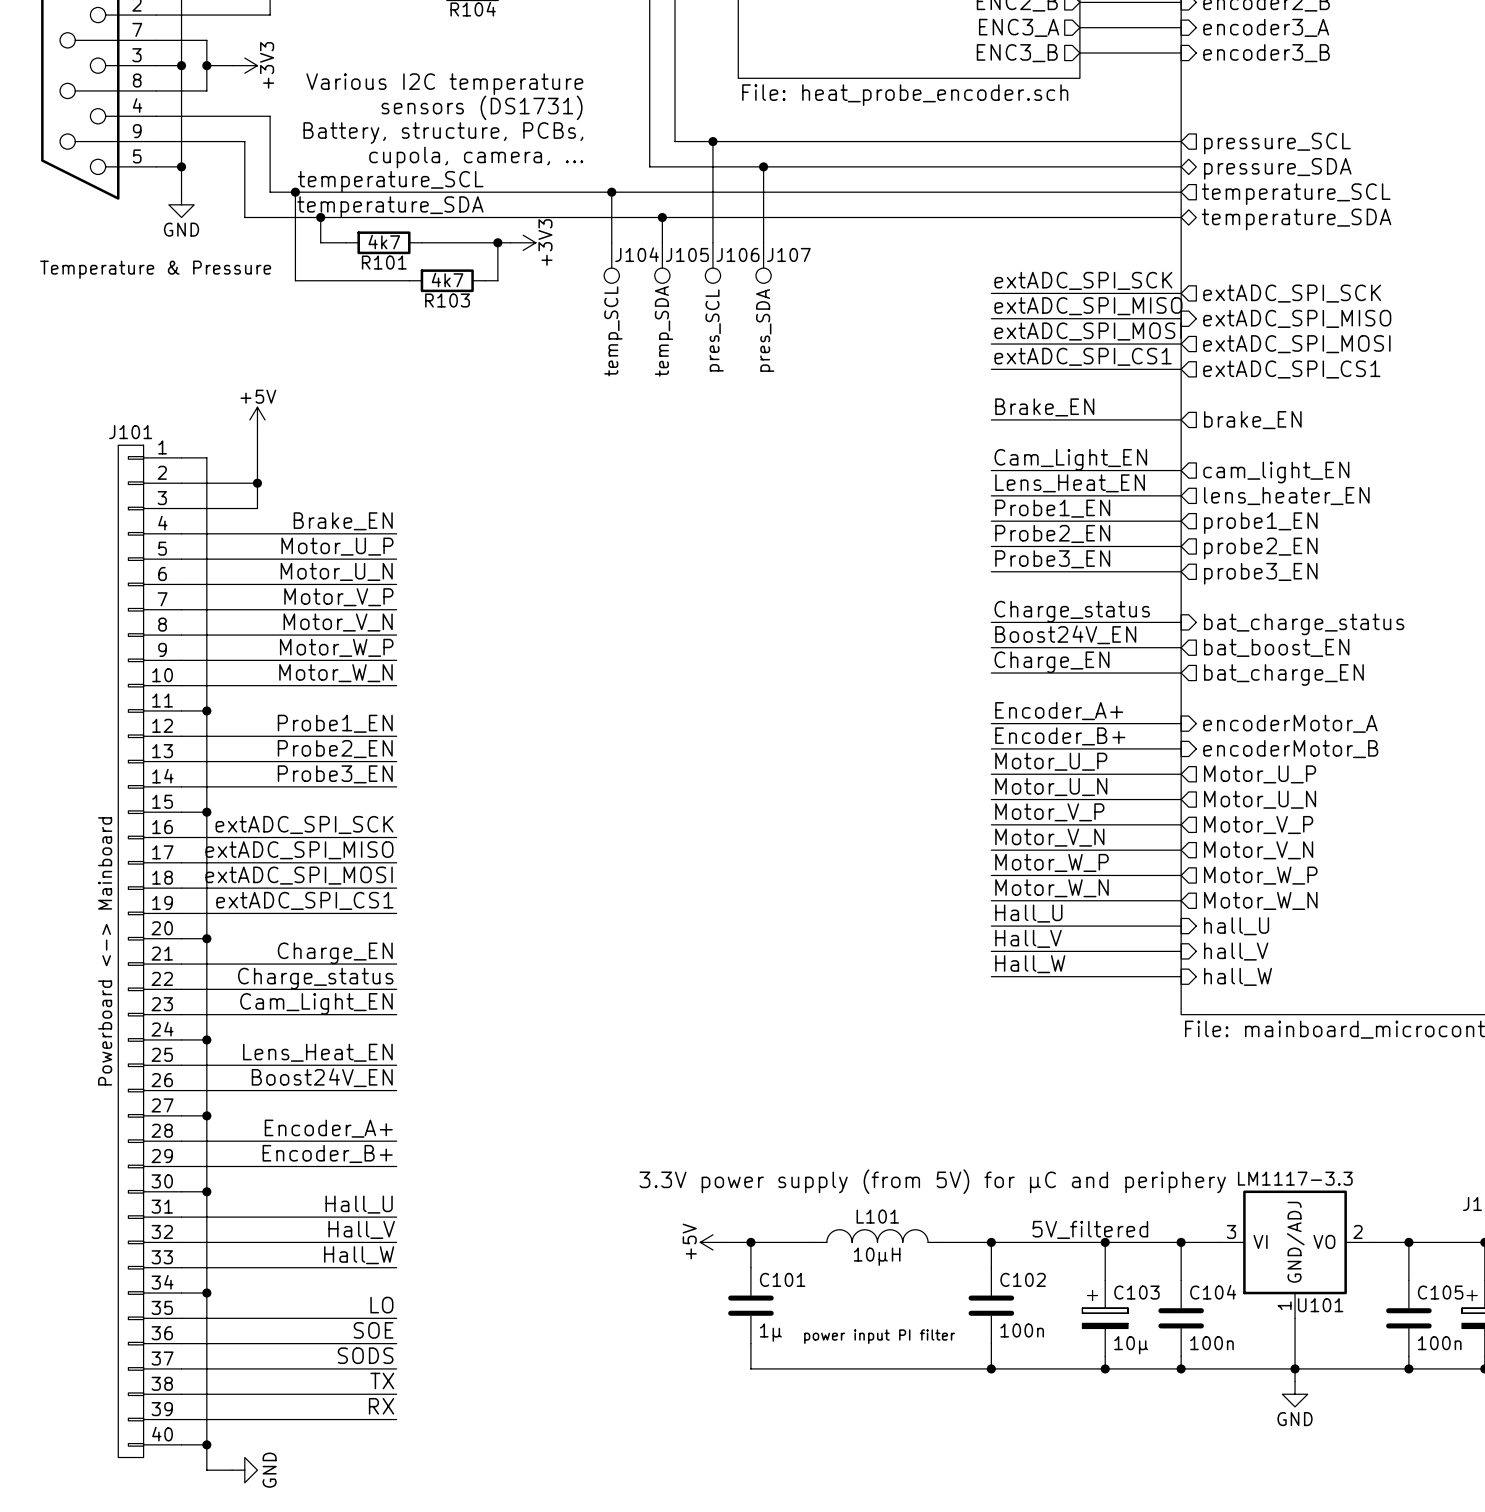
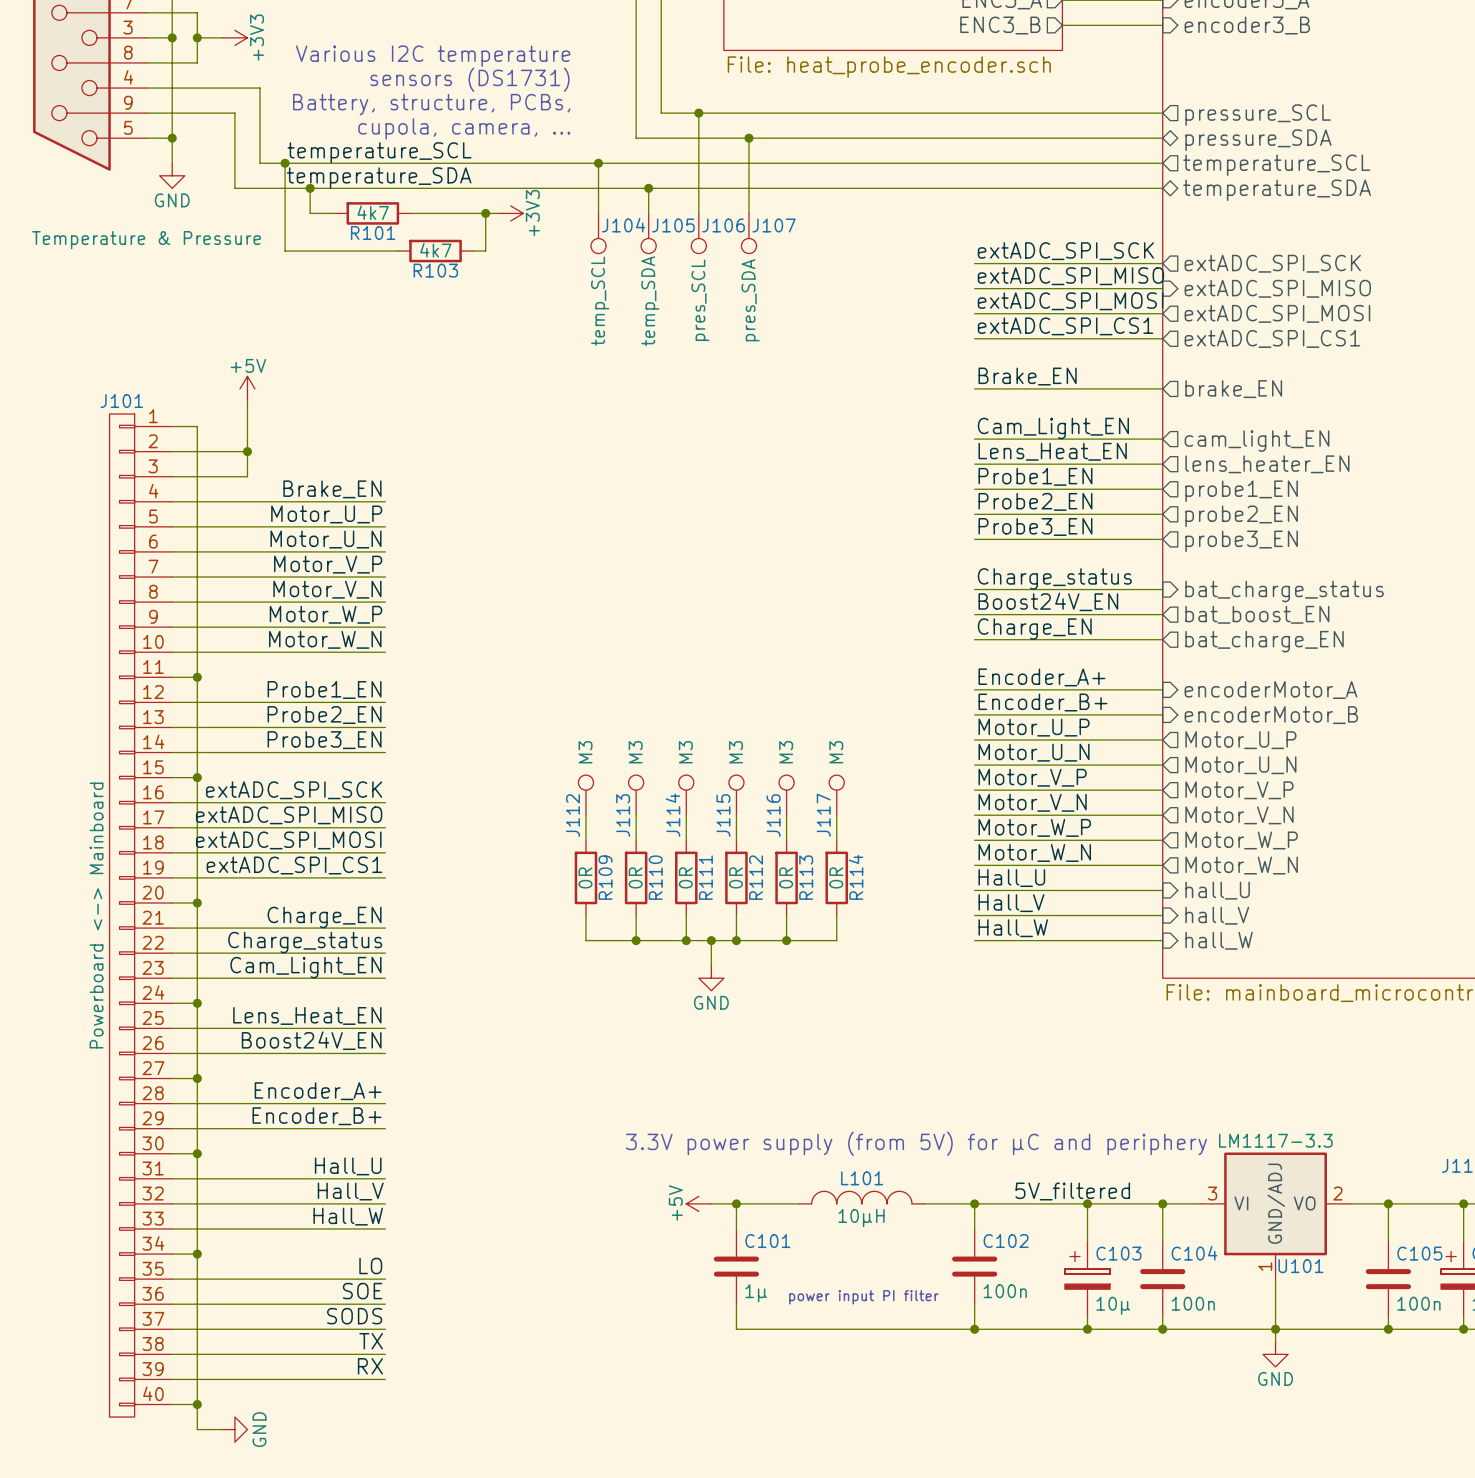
J112: none -> M3 (585, 795)
J113: none -> M3 (636, 795)
J114: none -> M3 (686, 795)
J115: none -> M3 (736, 795)
J116: none -> M3 (786, 795)
J117: none -> M3 (836, 795)
wire: none -> (585, 815) (585, 840)
wire: none -> (636, 815) (636, 840)
wire: none -> (686, 815) (686, 840)
wire: none -> (736, 815) (736, 840)
wire: none -> (786, 815) (786, 840)
wire: none -> (836, 815) (836, 840)
R109: none -> 0R (585, 877)
R110: none -> 0R (636, 877)
R111: none -> 0R (686, 877)
R112: none -> 0R (736, 877)
R113: none -> 0R (786, 877)
R114: none -> 0R (836, 877)
wire: none -> (585, 915) (585, 940) (836, 940) (836, 915)
wire: none -> (636, 915) (636, 940)
wire: none -> (686, 915) (686, 940)
wire: none -> (736, 915) (736, 940)
wire: none -> (786, 915) (786, 940)
junction: none -> (636, 940)
junction: none -> (686, 940)
wire: none -> (711, 940) (711, 965)
junction: none -> (711, 940)
junction: none -> (736, 940)
junction: none -> (786, 940)
power symbol: none -> GND (711, 978)

